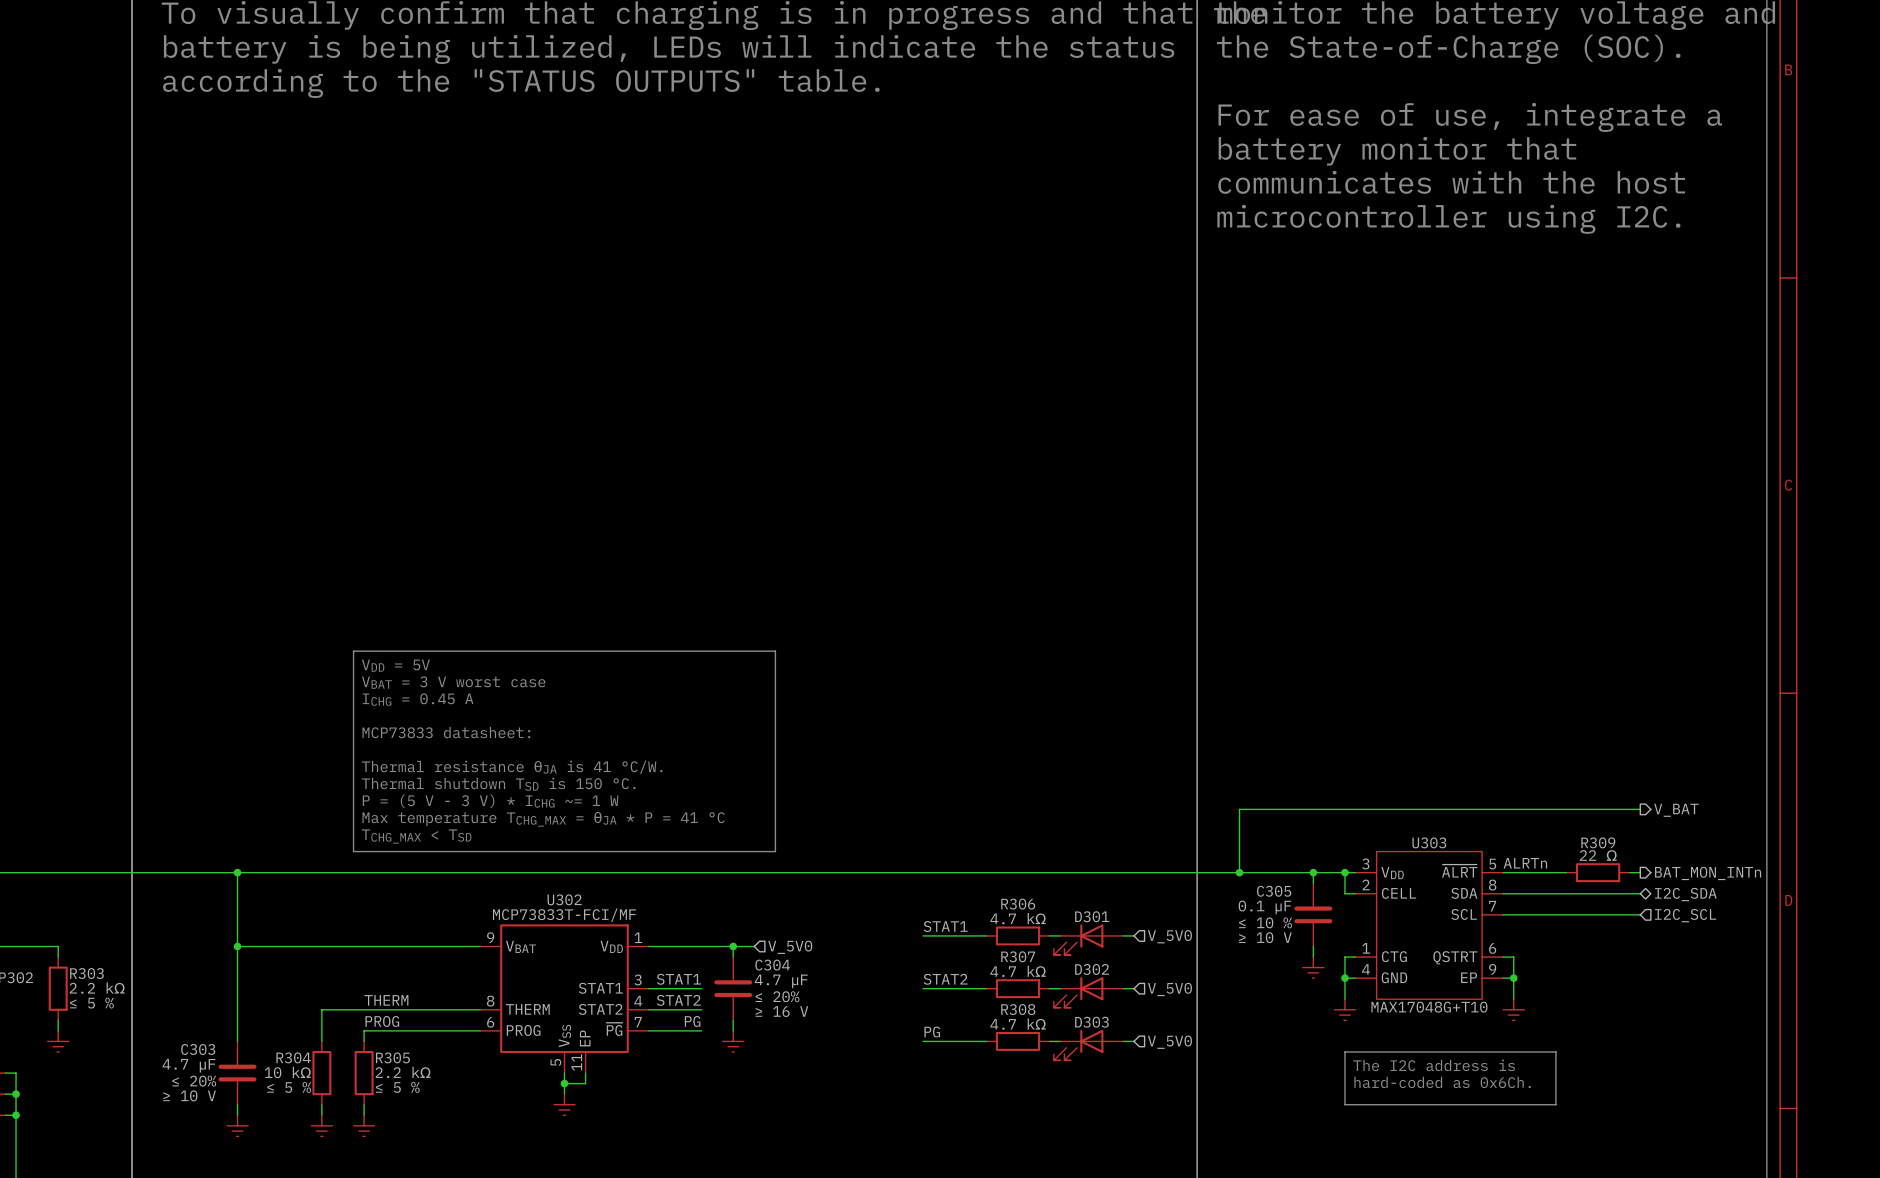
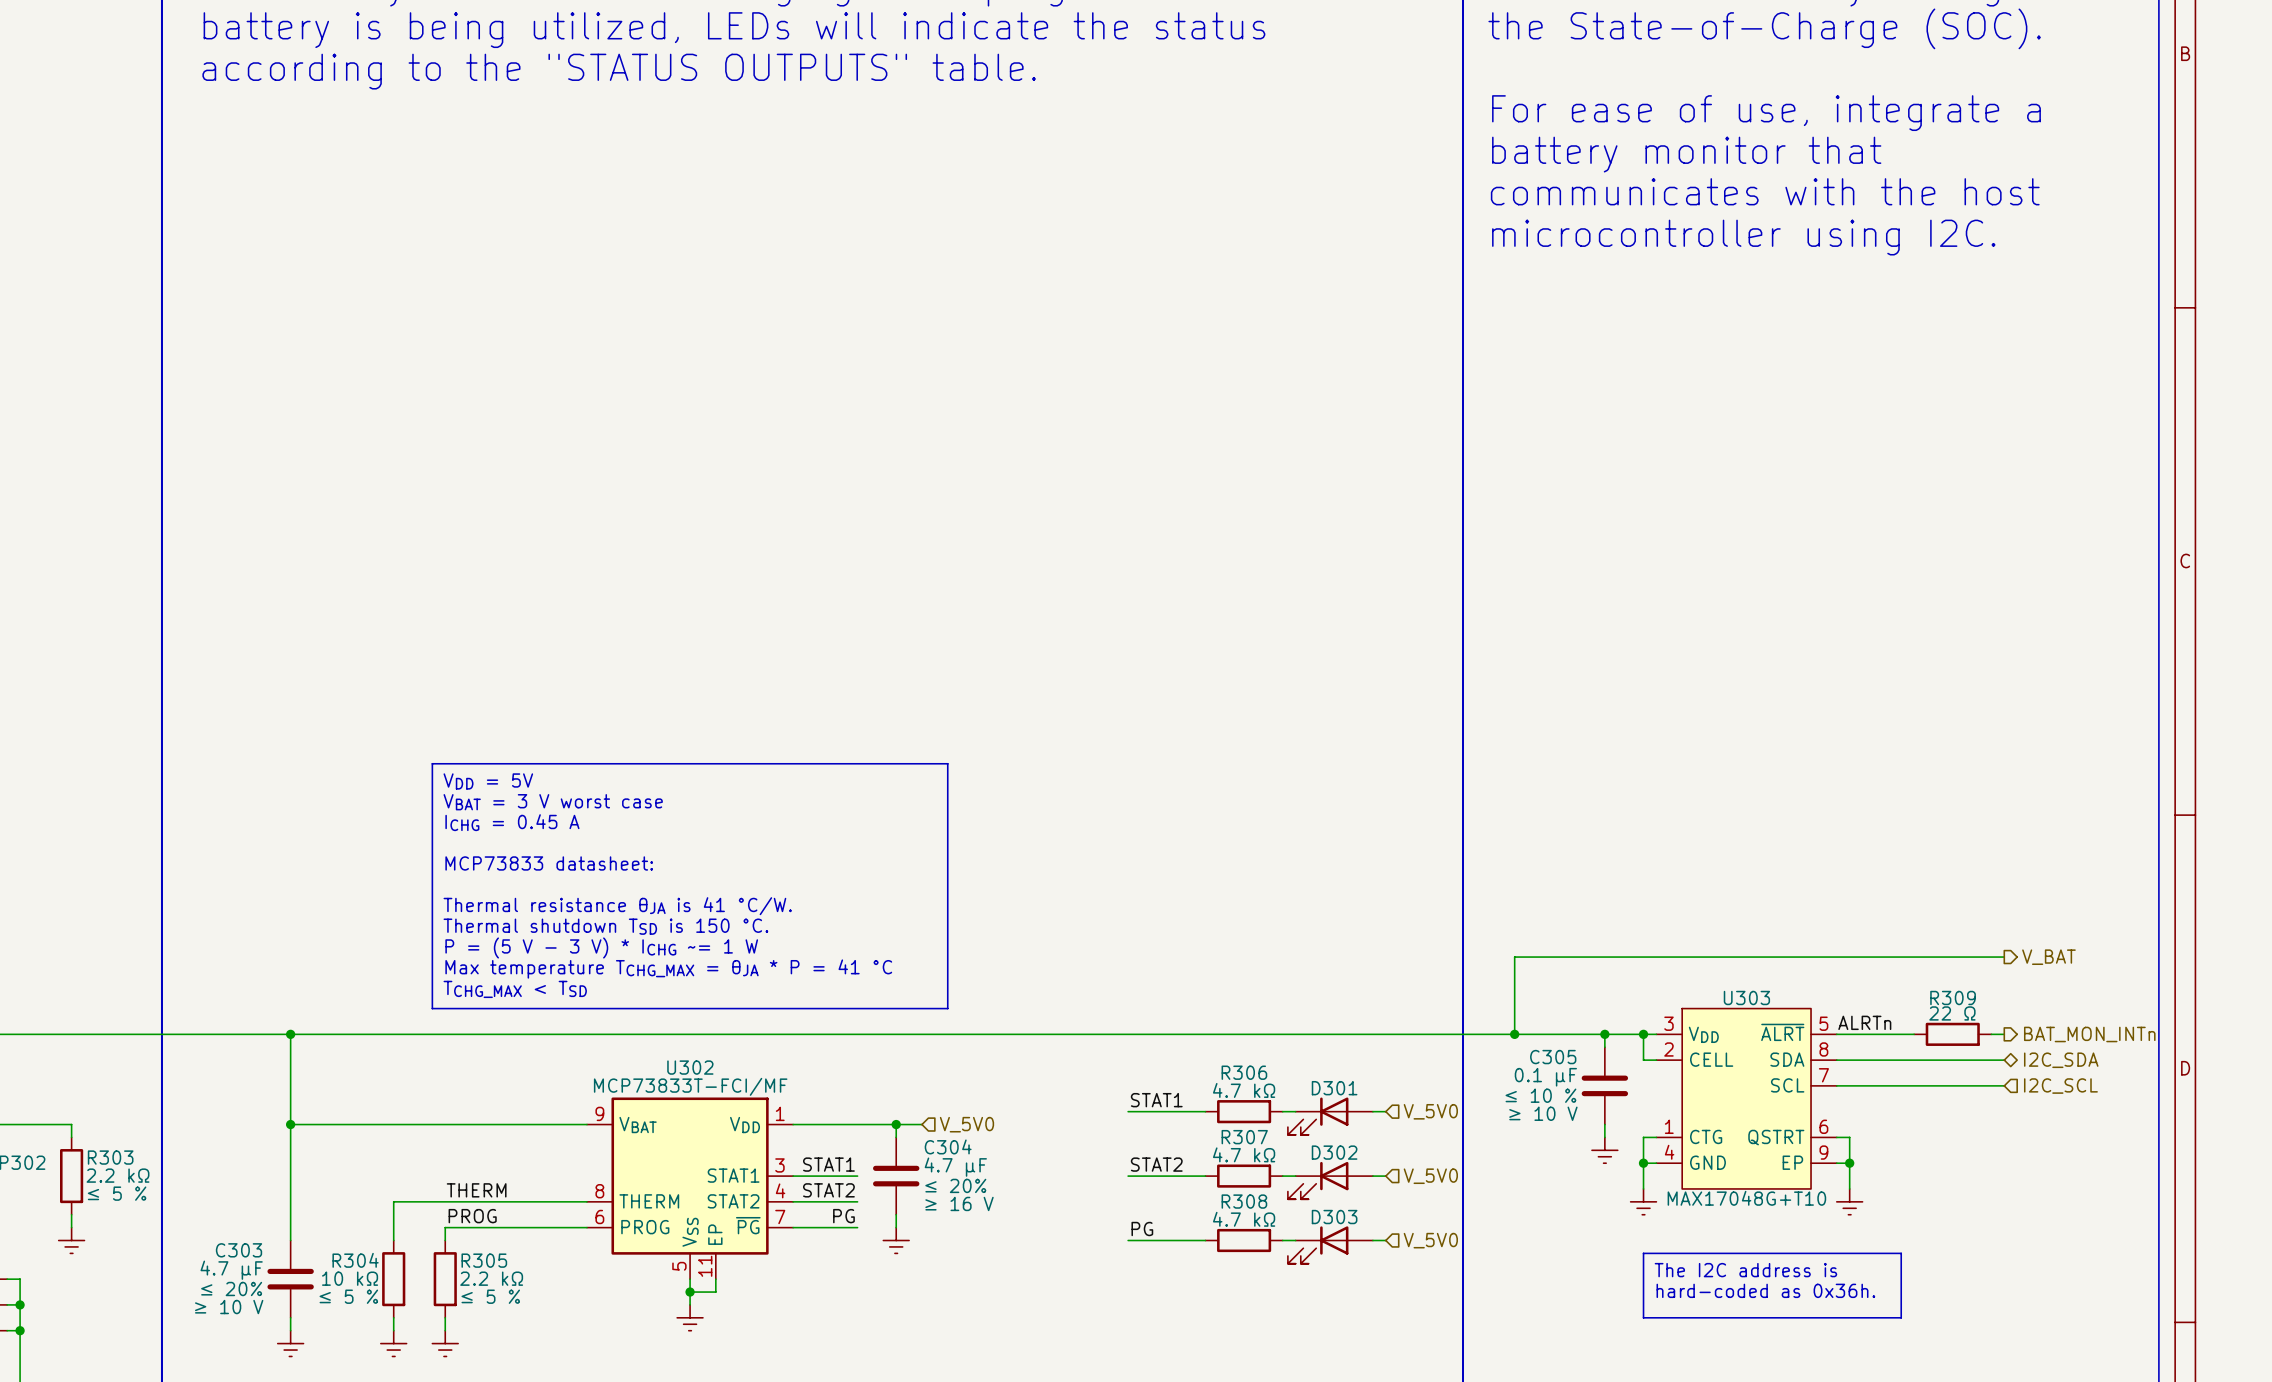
text: hard-coded as 0x6Ch. (1442, 1082) -> hard-coded as 0x36h. (1765, 1290)

